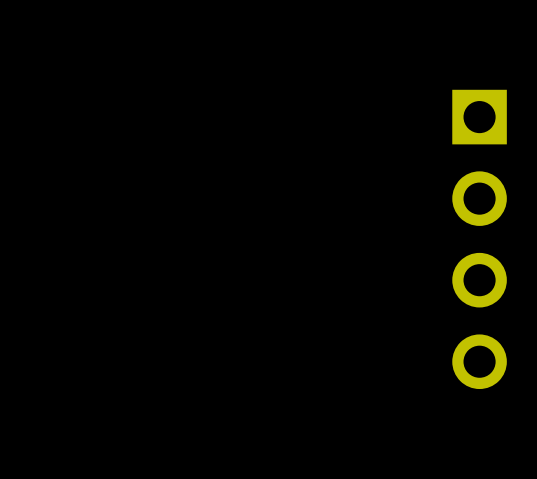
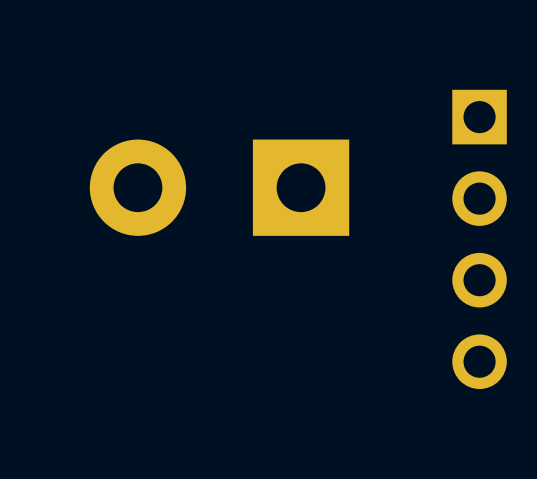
part: none -> (219, 187)

